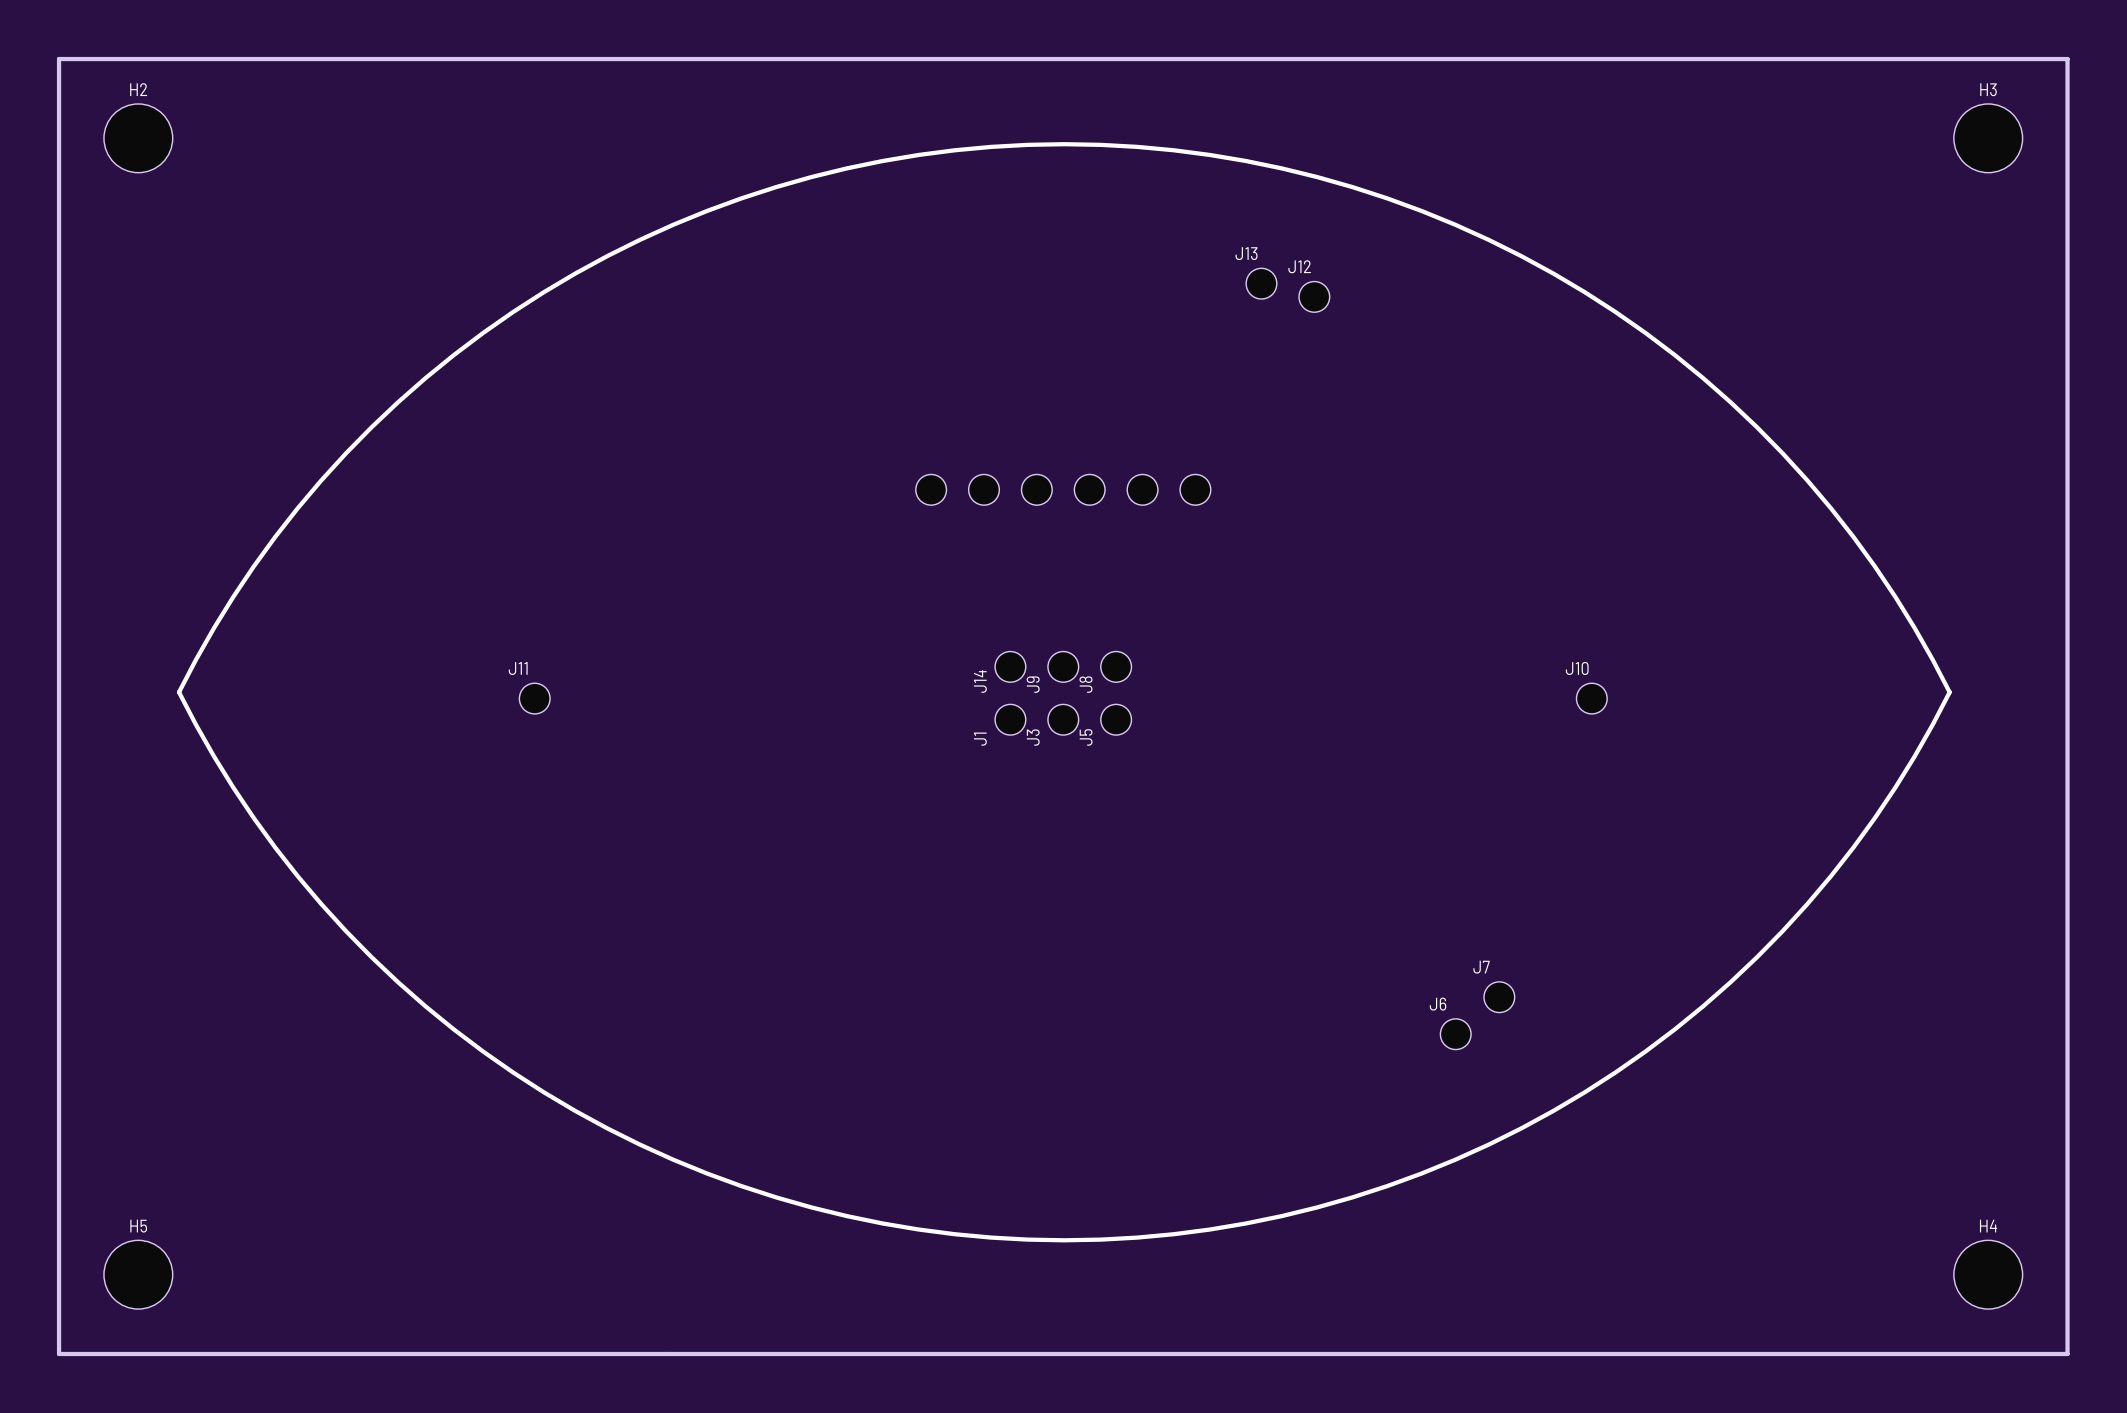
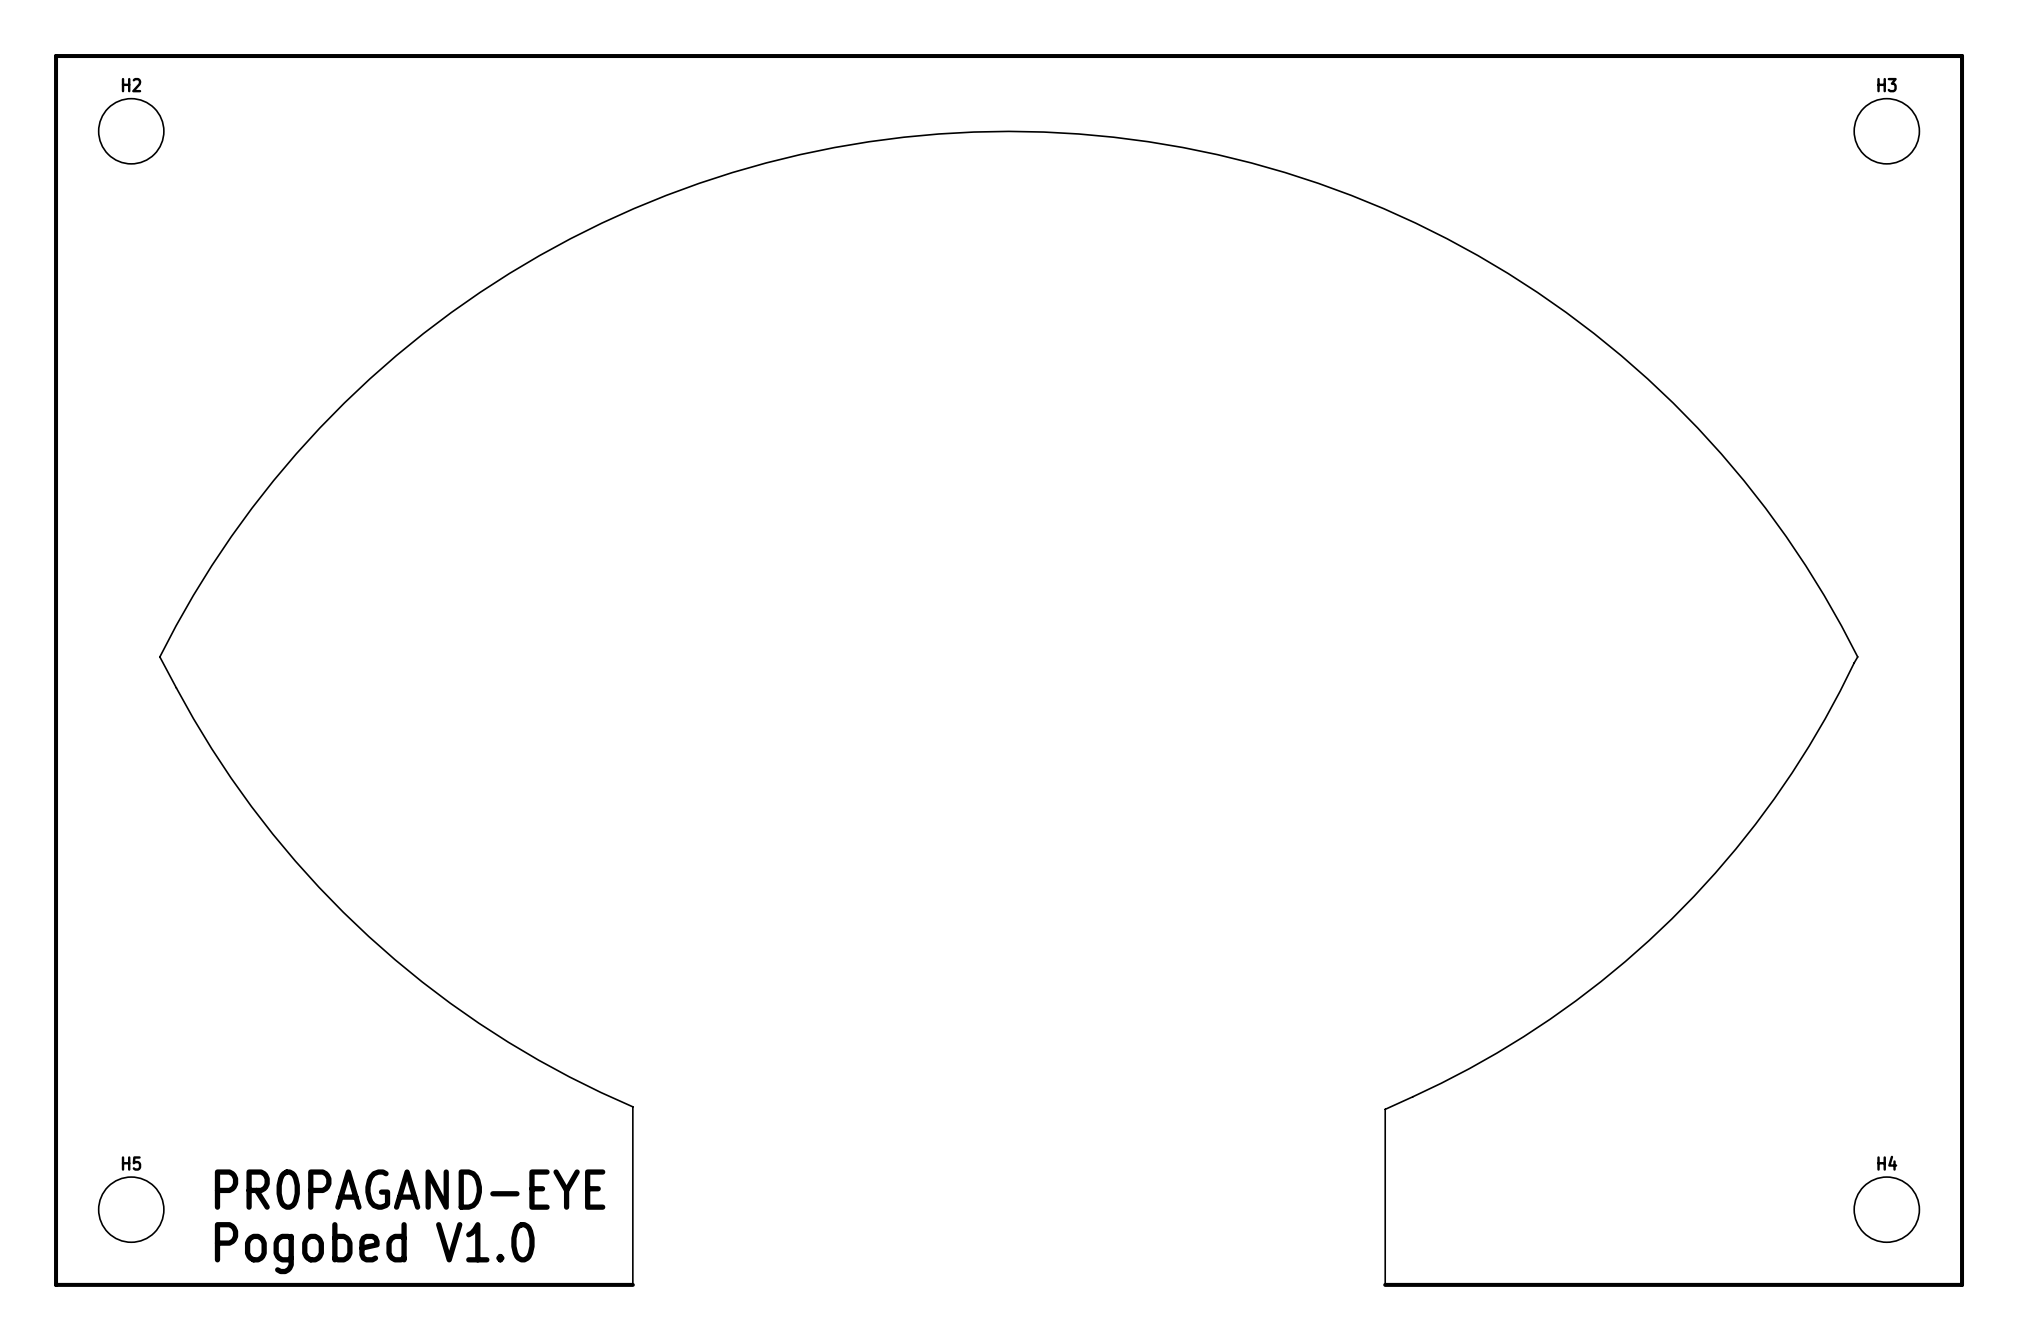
J13: (1261, 283) -> none
J12: (1314, 296) -> none
part: (1063, 489) -> none
J14: (1010, 666) -> none
J9: (1063, 666) -> none
J8: (1116, 666) -> none
line: (179, 692) (214, 628) (253, 566) (321, 480) (371, 427) (425, 378) (483, 333) (543, 292) (607, 256) (673, 224) (741, 198) (811, 177) (918, 154) (991, 146) (1064, 144) (1137, 146) (1210, 154) (1317, 177) (1387, 198) (1455, 224) (1521, 256) (1584, 292) (1645, 333) (1703, 378) (1757, 427) (1807, 480) (1875, 566) (1914, 628) (1949, 692) (1914, 756) (1875, 817) (1807, 904) (1757, 957) (1703, 1006) (1645, 1051) (1584, 1092) (1521, 1128) (1455, 1159) (1387, 1186) (1317, 1207) (1210, 1229) (1137, 1237) (1064, 1240) (991, 1237) (918, 1229) (811, 1207) (741, 1186) (673, 1159) (607, 1128) (543, 1092) (483, 1051) (425, 1006) (371, 957) (321, 904) (253, 817) (214, 756) (179, 692) -> none
J11: (534, 698) -> none
J10: (1591, 698) -> none
J1: (1010, 719) -> none
J3: (1063, 719) -> none
J5: (1116, 719) -> none
J7: (1499, 997) -> none
J6: (1455, 1034) -> none
text: none -> PR0PAGAND-EYE (410, 1189)
text: none -> Pogobed V1.0 (374, 1248)
board edge: (666, 1353) (1459, 1353) -> (632, 1284) (632, 1106) (569, 1076) (508, 1042) (422, 981) (368, 936) (295, 861) (251, 806) (211, 748) (159, 656) (193, 595) (231, 536) (296, 453) (344, 402) (396, 355) (451, 312) (509, 273) (570, 238) (633, 208) (699, 183) (766, 162) (834, 147) (903, 137) (1008, 131) (1113, 137) (1183, 147) (1251, 162) (1318, 183) (1383, 208) (1447, 238) (1507, 273) (1566, 312) (1621, 355) (1673, 402) (1721, 453) (1786, 536) (1824, 595) (1857, 656) (1825, 719) (1774, 798) (1715, 873) (1671, 918) (1600, 981) (1550, 1019) (1469, 1068) (1385, 1109) (1385, 1284)

